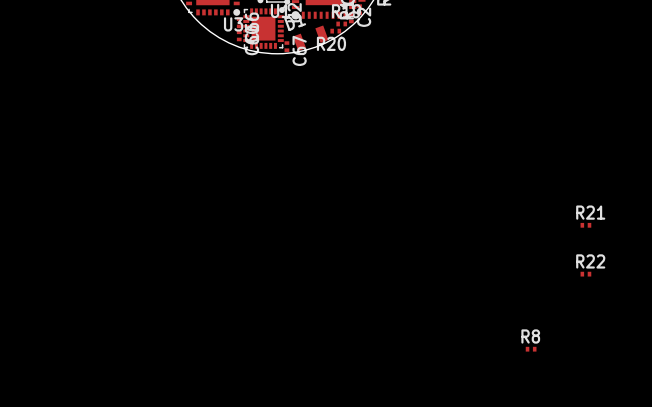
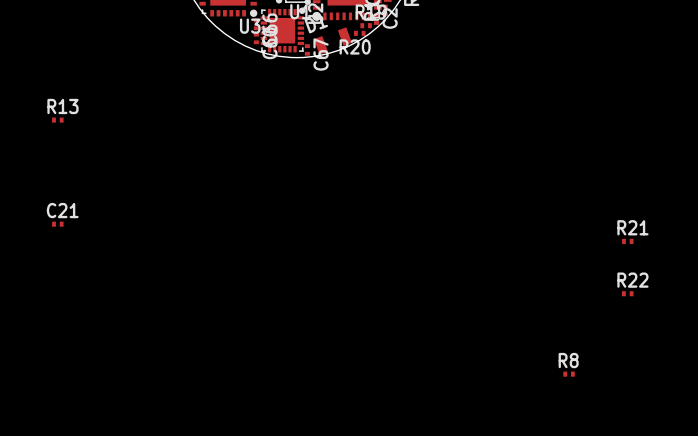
R13: none -> (57, 120)
C21: none -> (57, 224)

